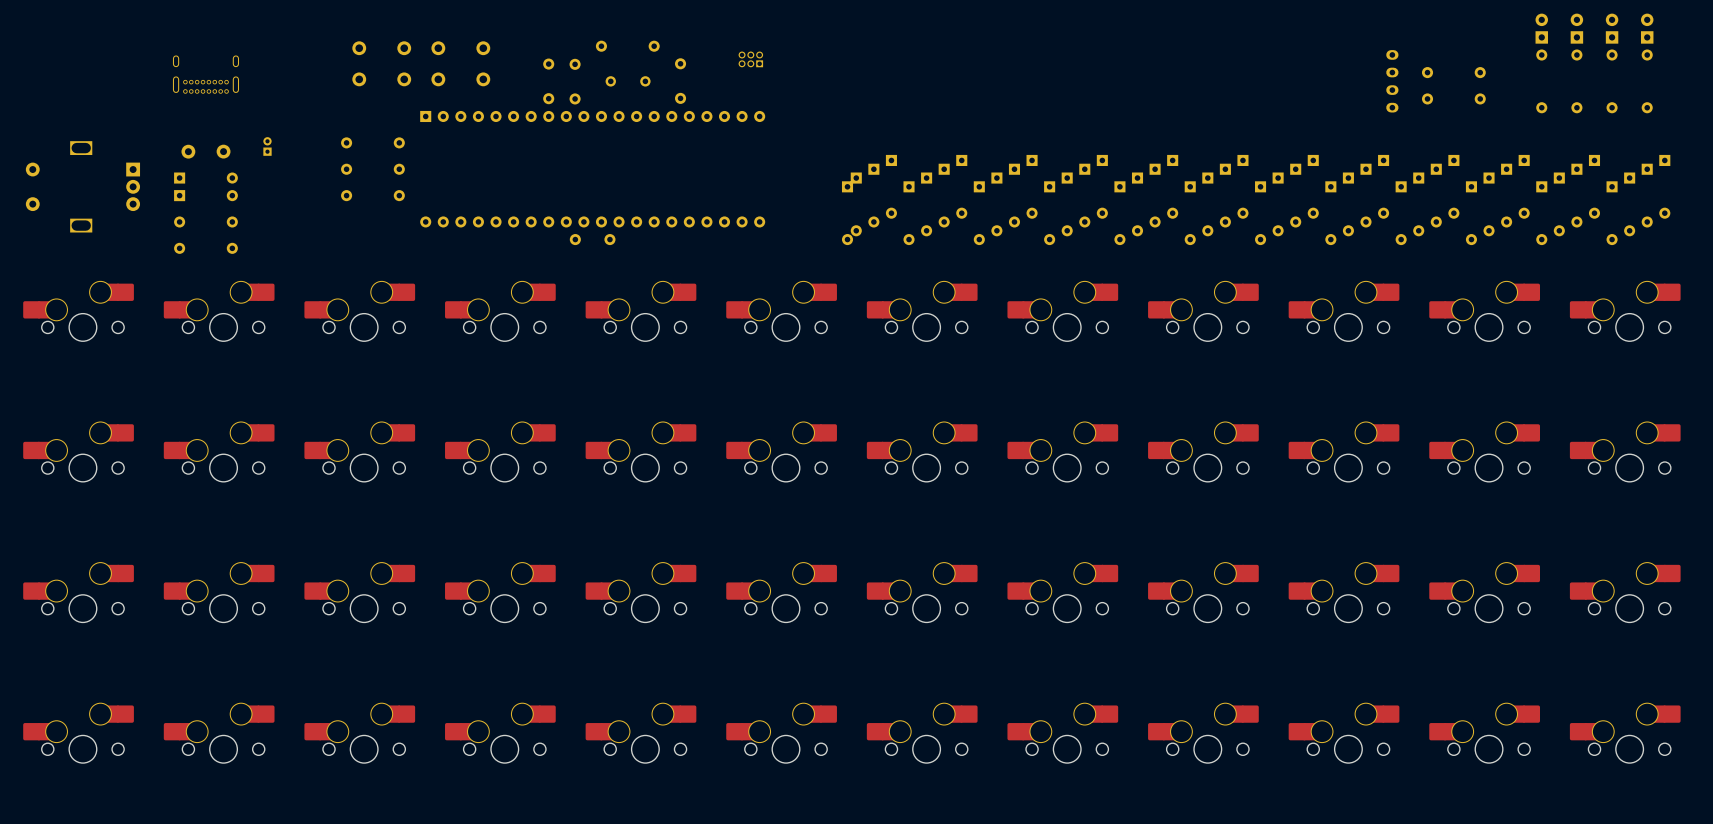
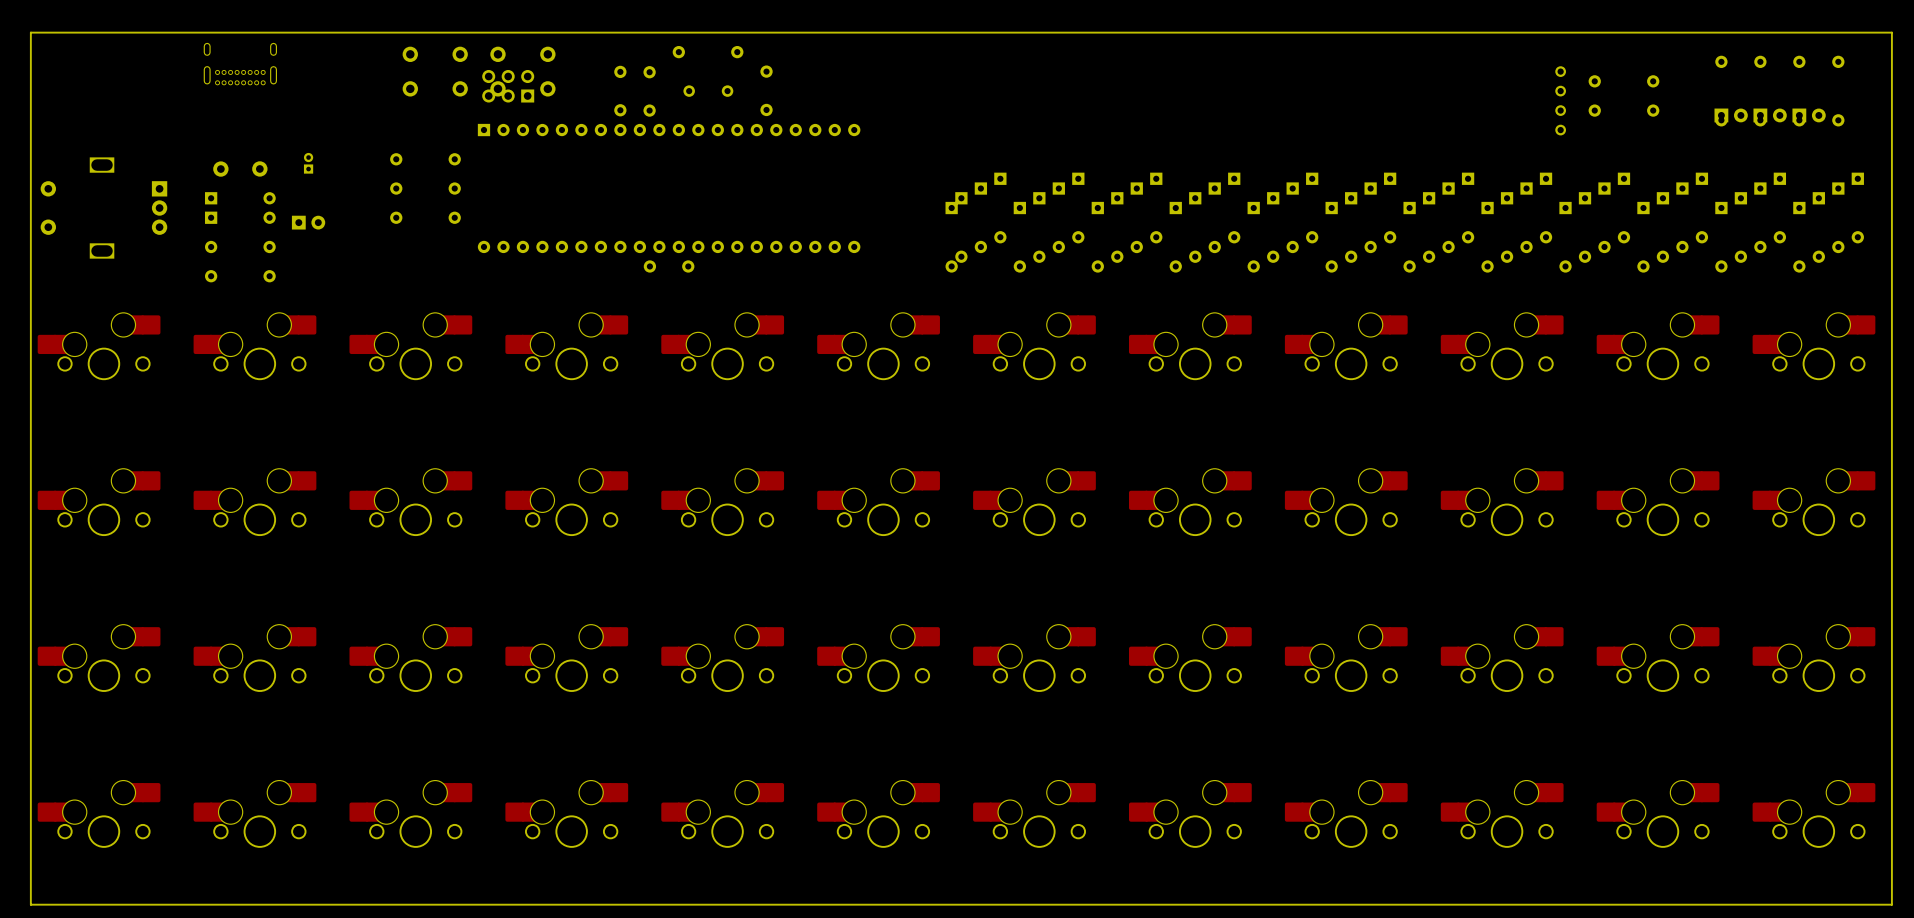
part: (1541, 28) -> none
part: (1576, 28) -> none
part: (1612, 28) -> none
part: (1647, 28) -> none
board edge: none -> (1891, 32) (30, 32) (30, 904) (1891, 904) (1891, 32)
part: (750, 59) -> none
part position: (205, 74) -> (240, 64)
part: none -> (508, 86)
part: (1392, 81) -> none
part: none -> (1560, 100)
part: none -> (1731, 115)
part: none -> (1770, 115)
part: none -> (1809, 115)
part: none -> (308, 222)

